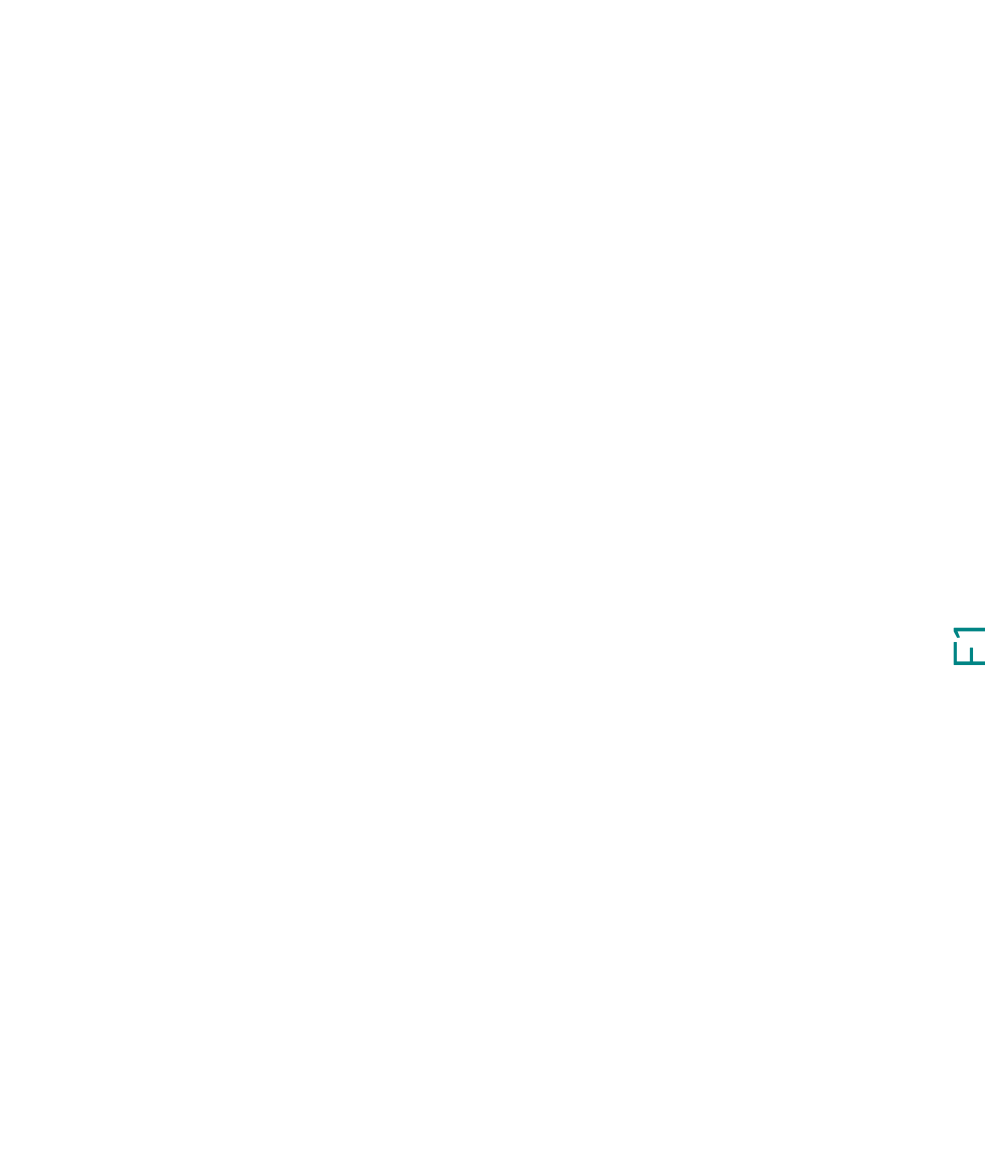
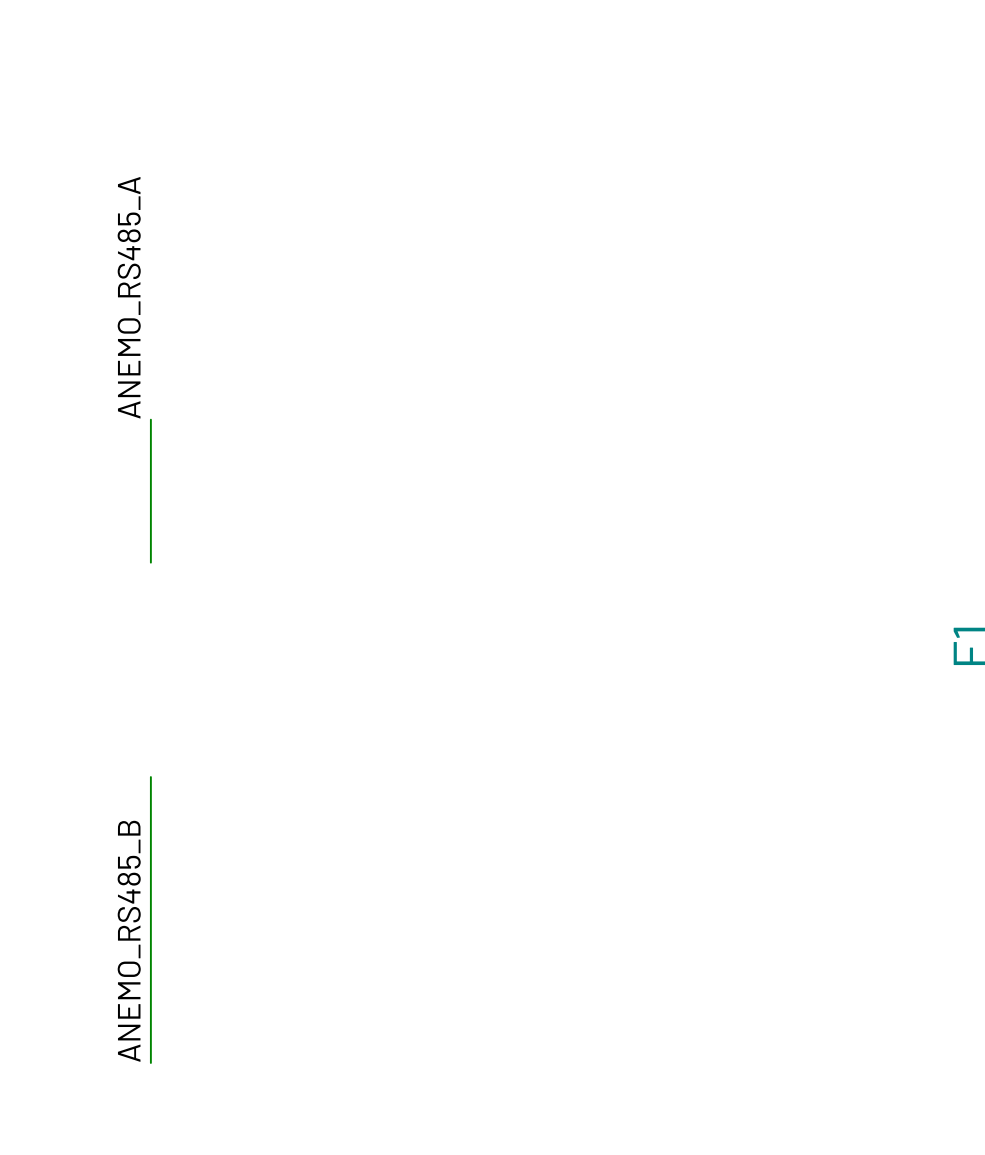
label: none -> ANEMO_RS485_A (129, 297)
wire: none -> (150, 419) (150, 562)
wire: none -> (150, 777) (150, 1062)
label: none -> ANEMO_RS485_B (129, 941)

